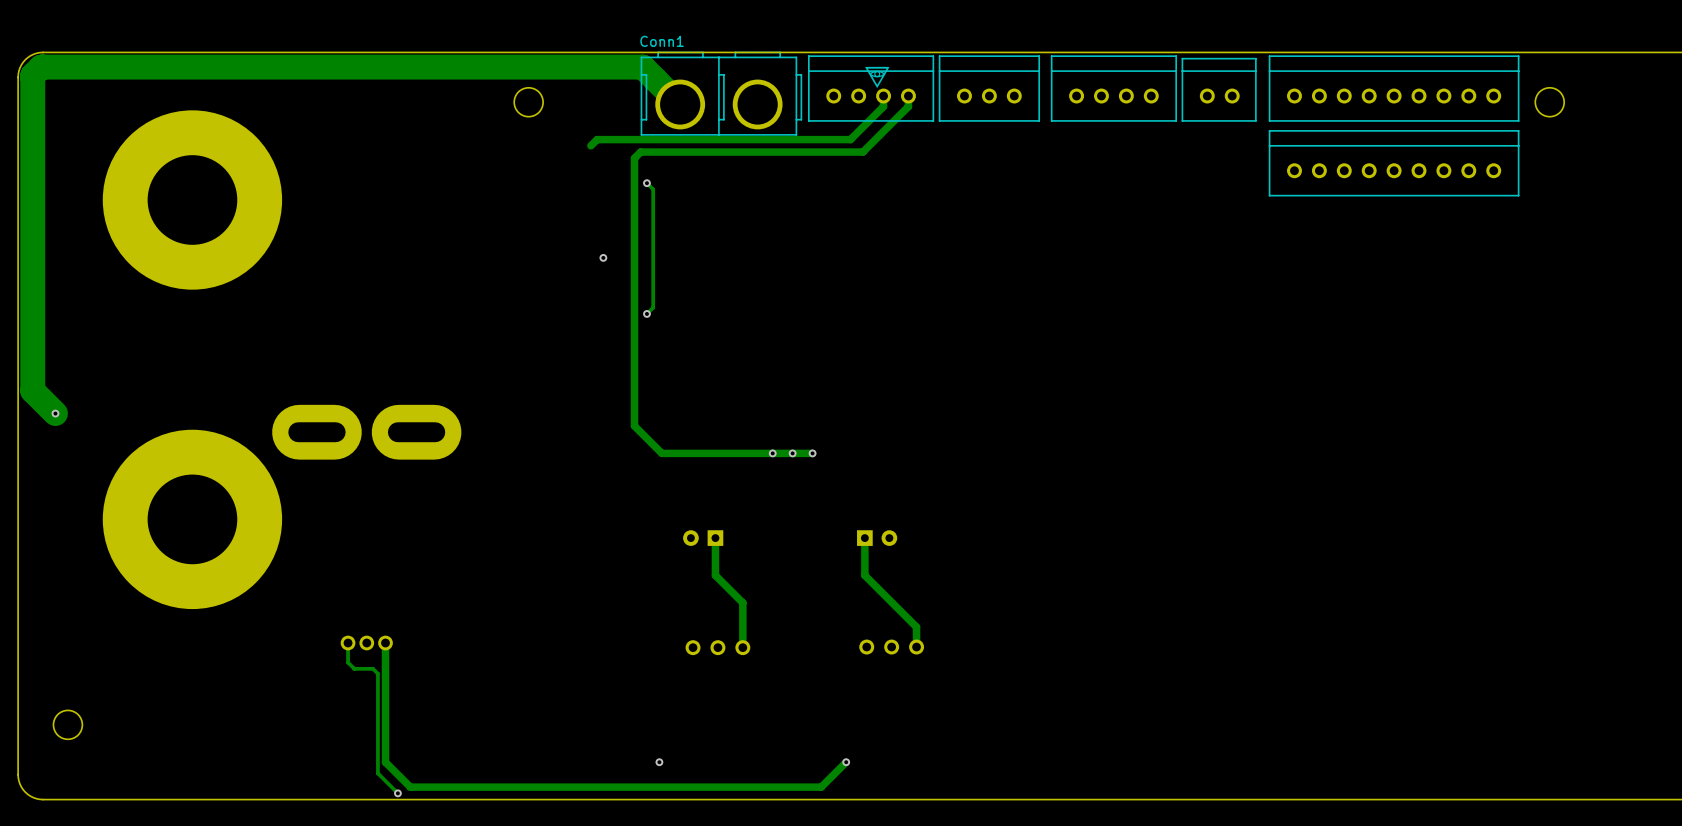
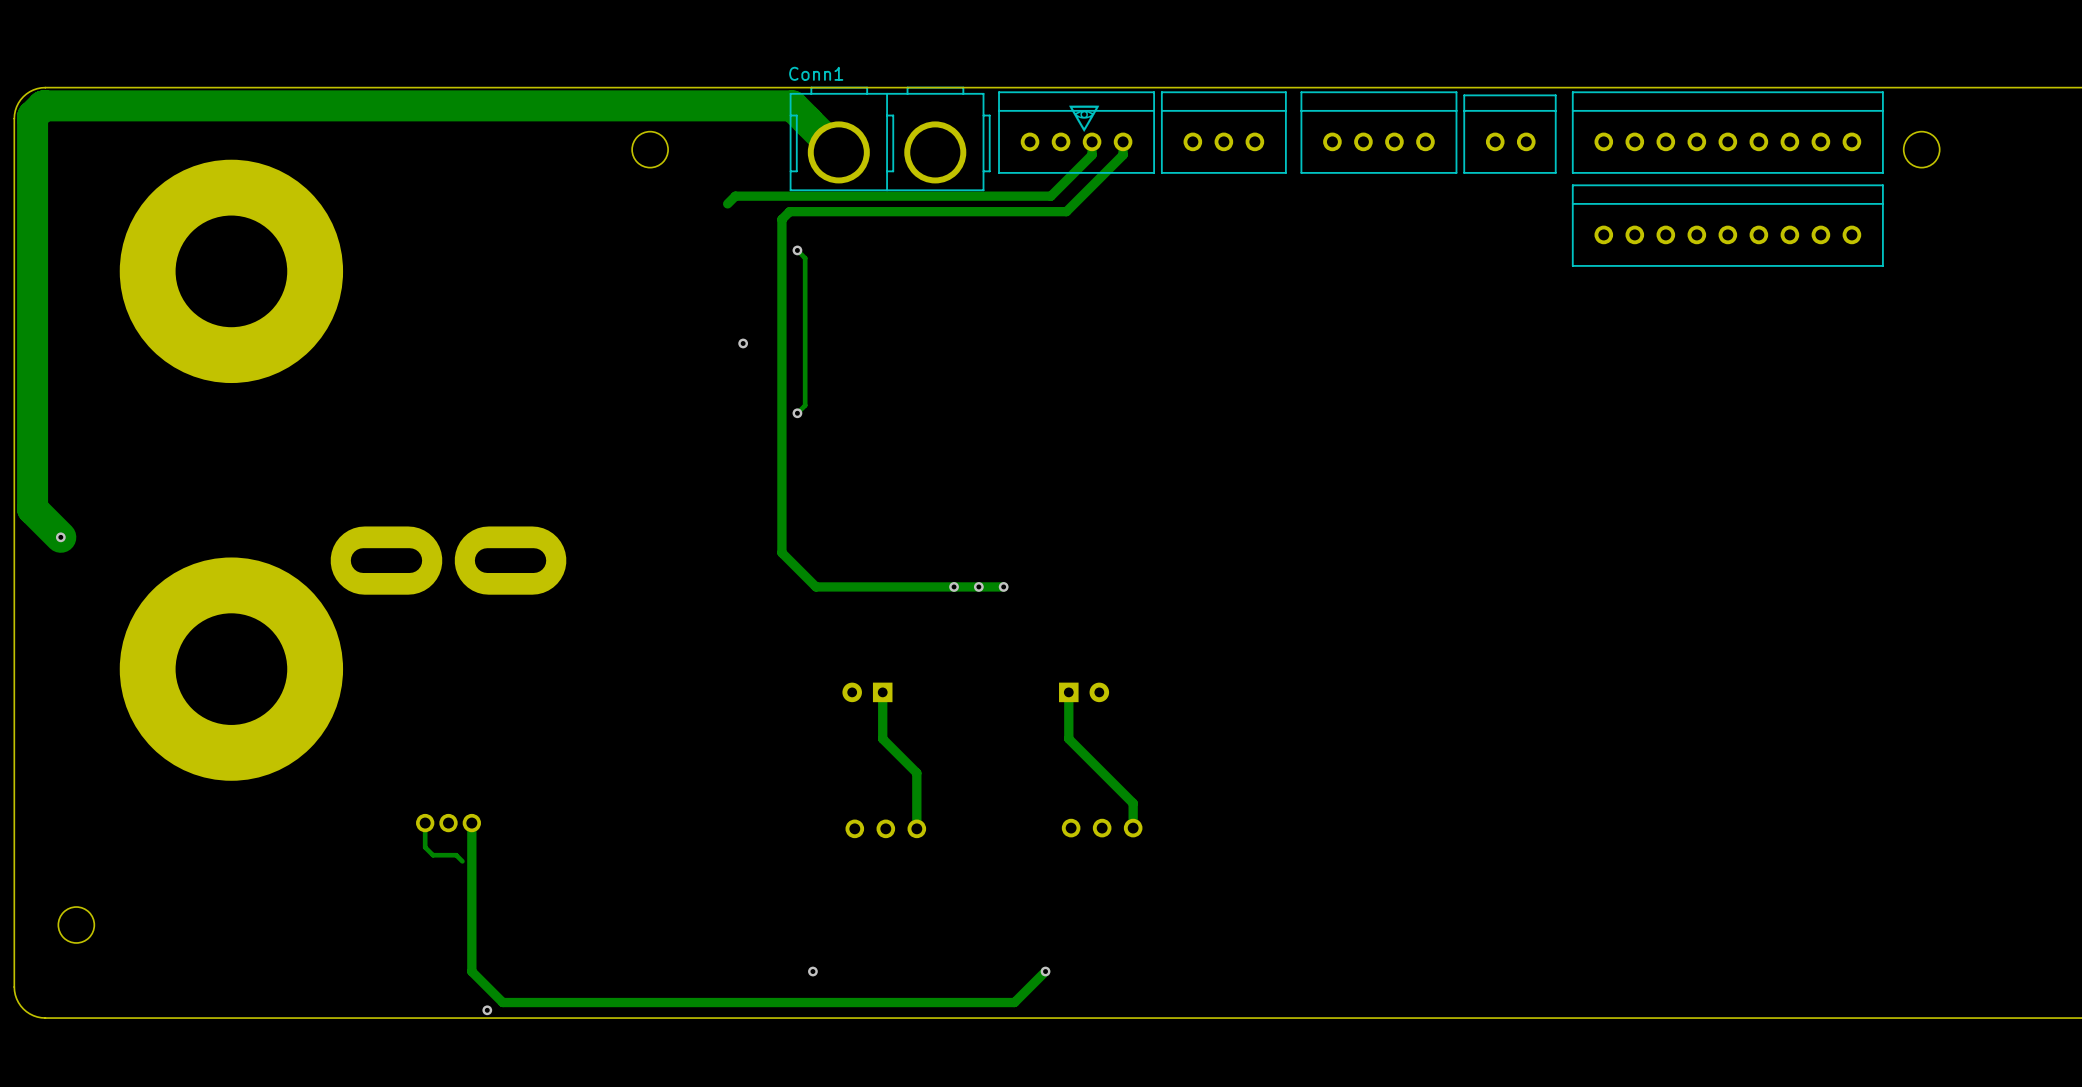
track: (377, 673) (377, 773) (397, 793) -> none

